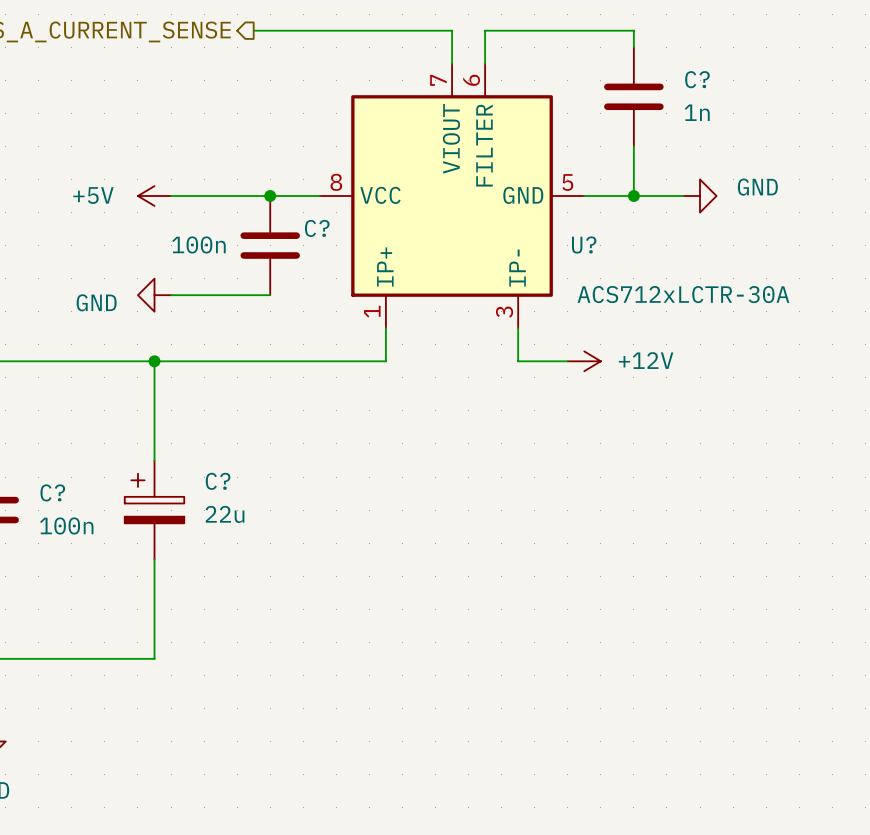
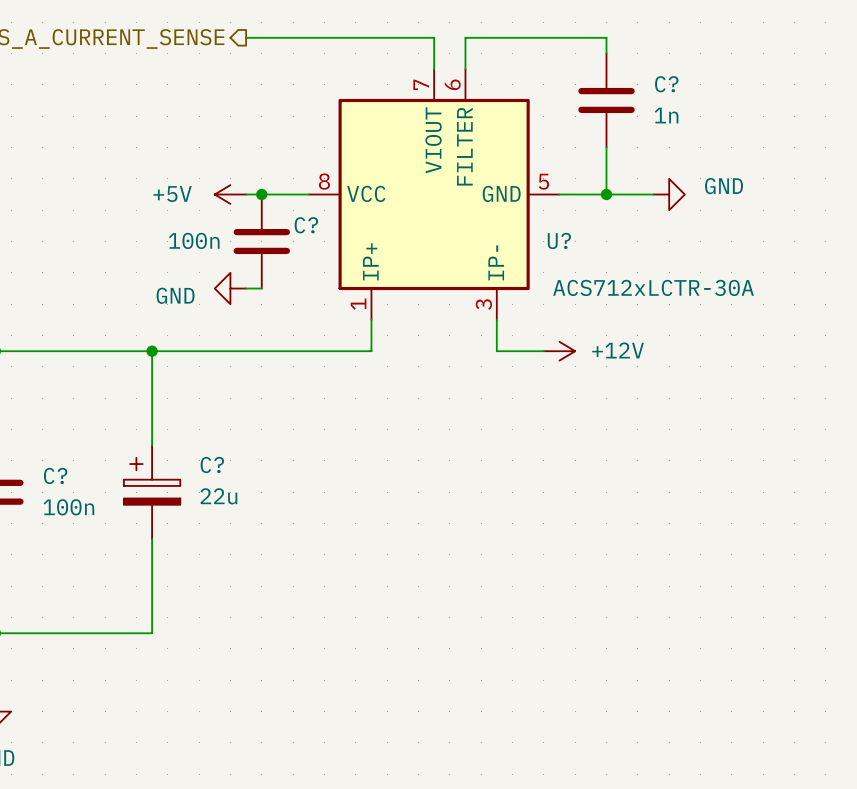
power symbol position: +5V (154, 196) -> +5V (230, 194)
wire: (171, 196) (253, 196) -> none
power symbol position: GND (154, 295) -> GND (230, 288)
wire: (171, 295) (253, 295) -> none

